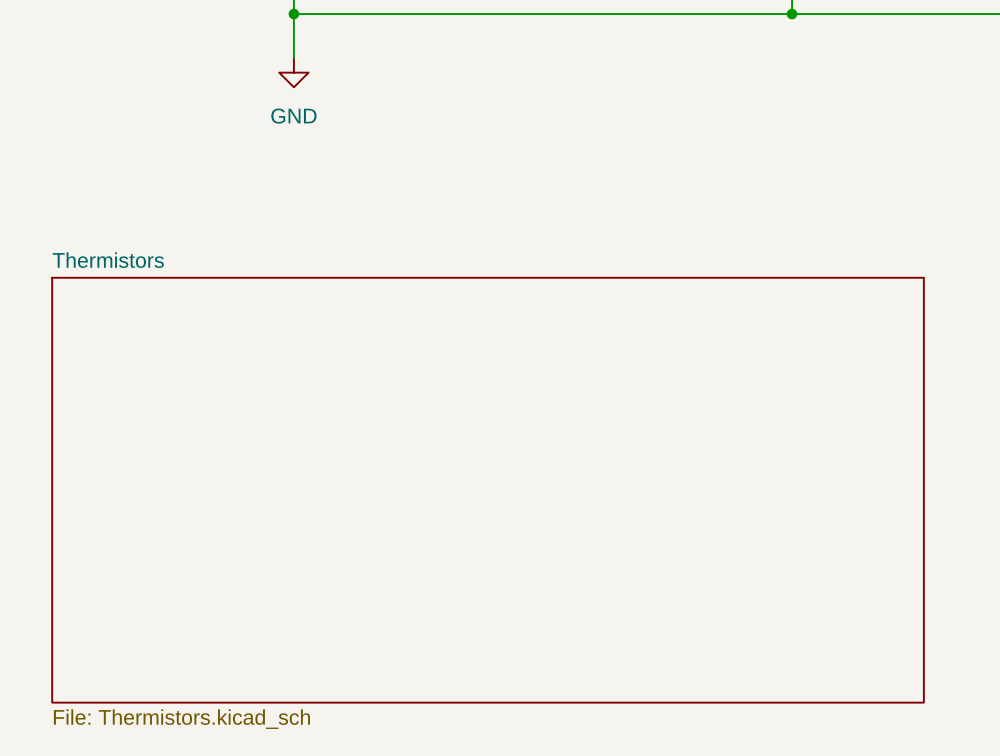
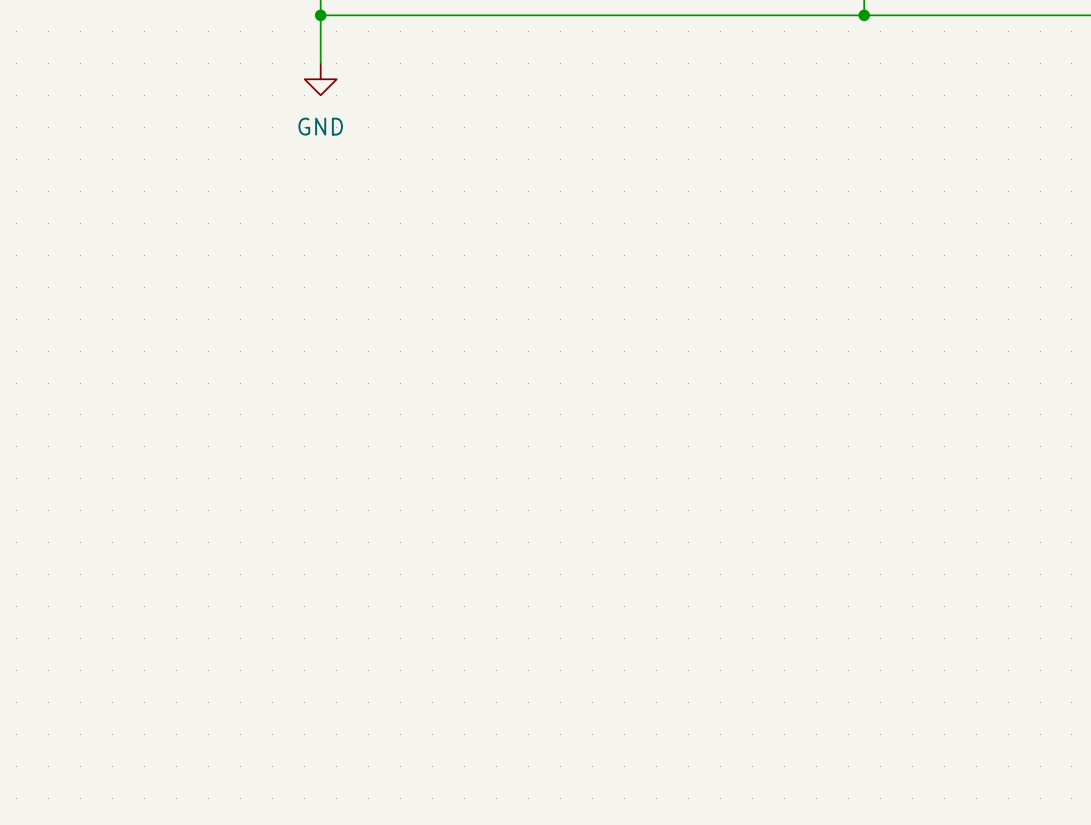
sheet Thermistors: File: Thermistors.kicad_sch (488, 490) -> none

